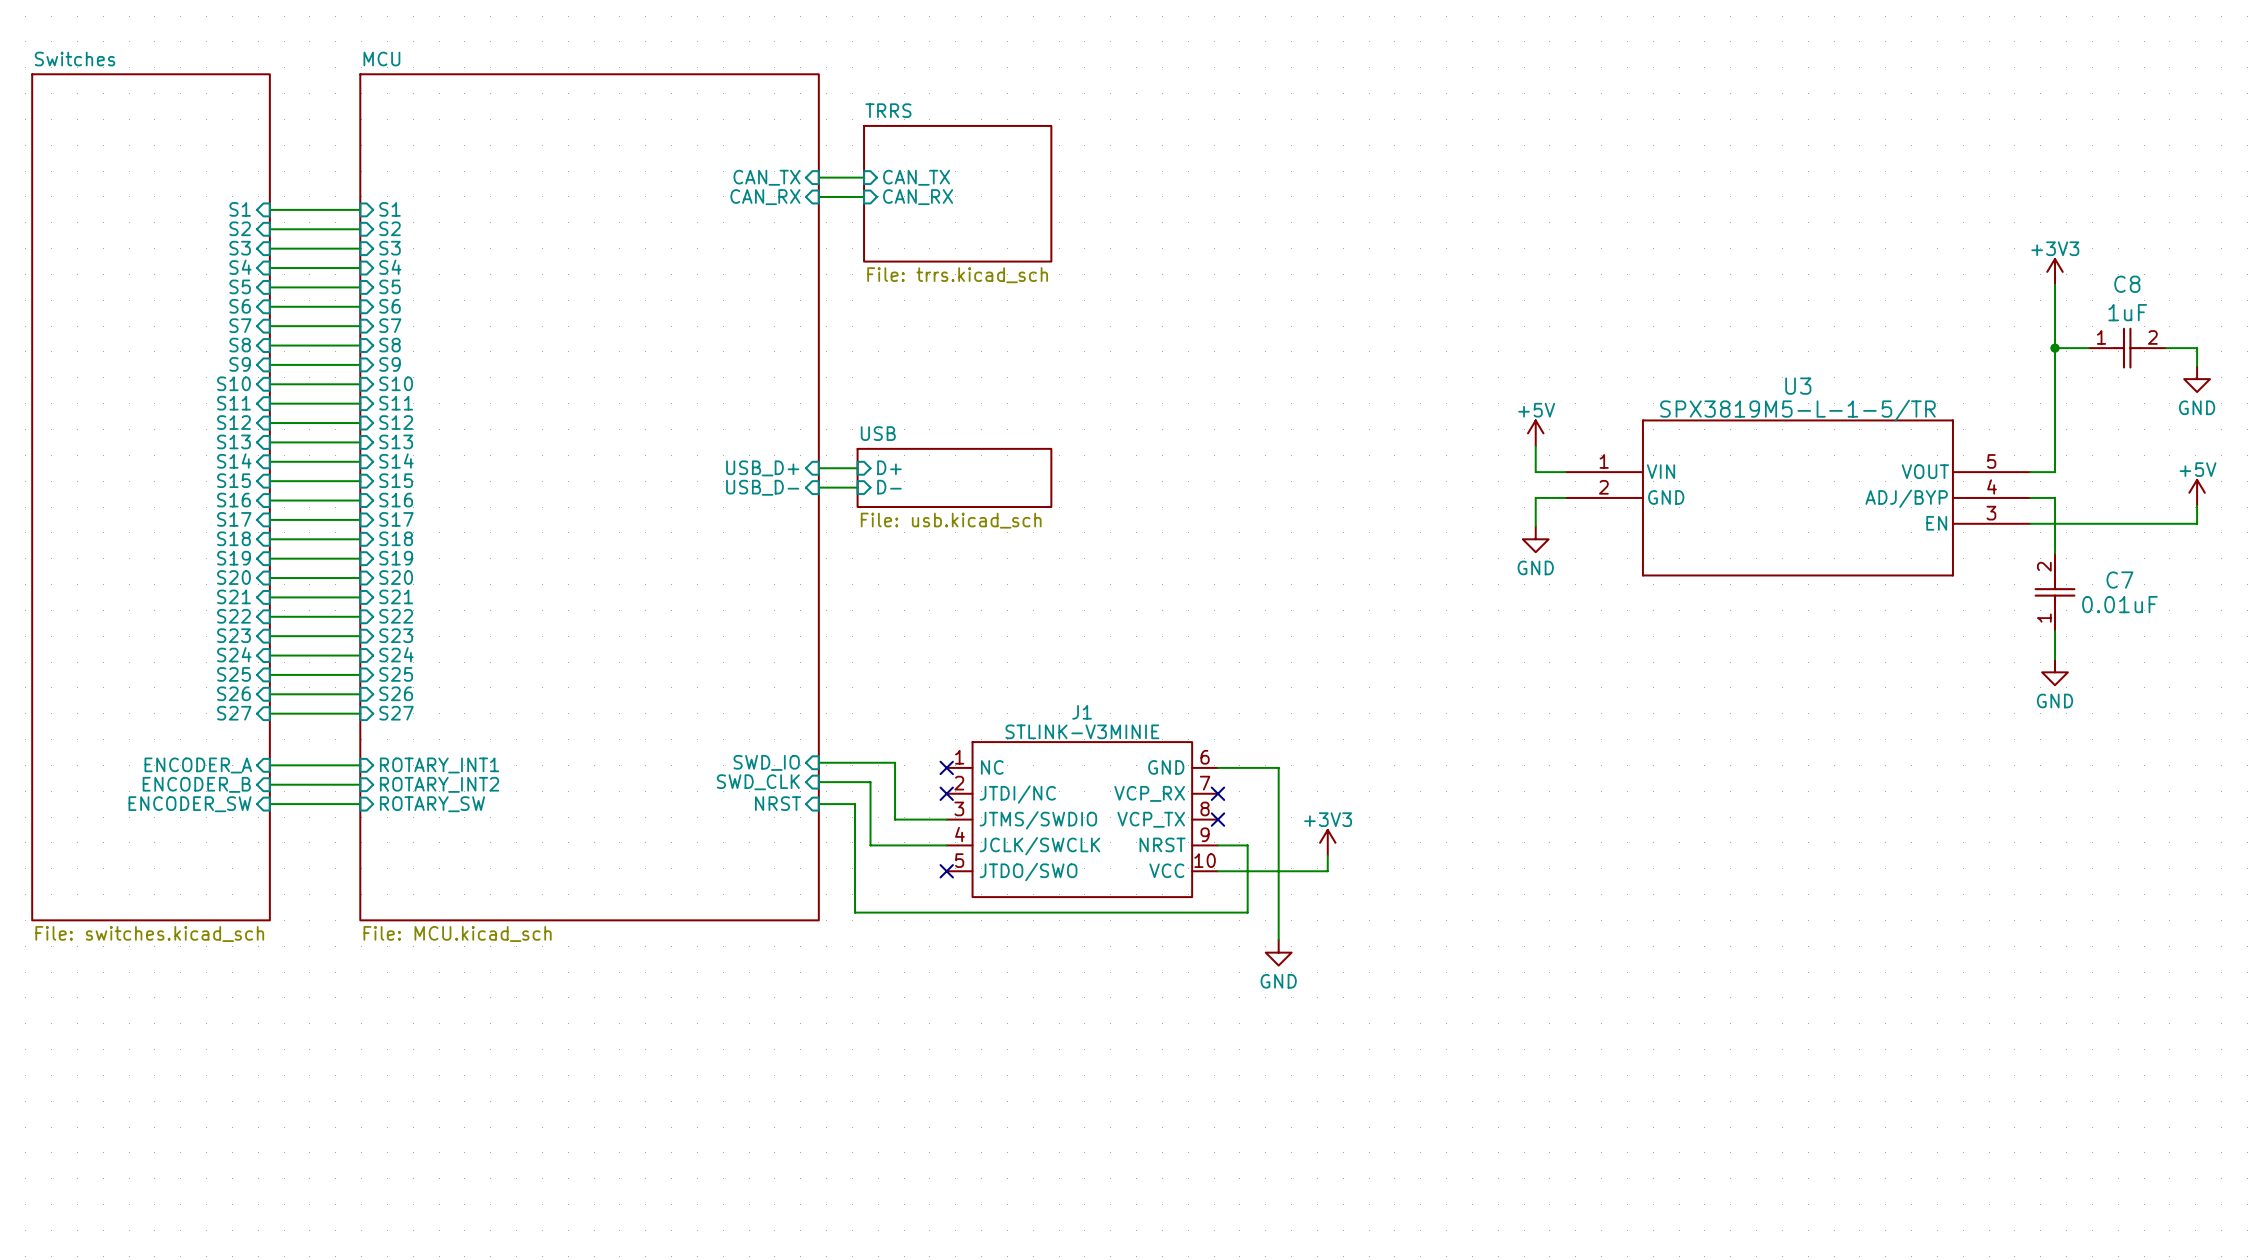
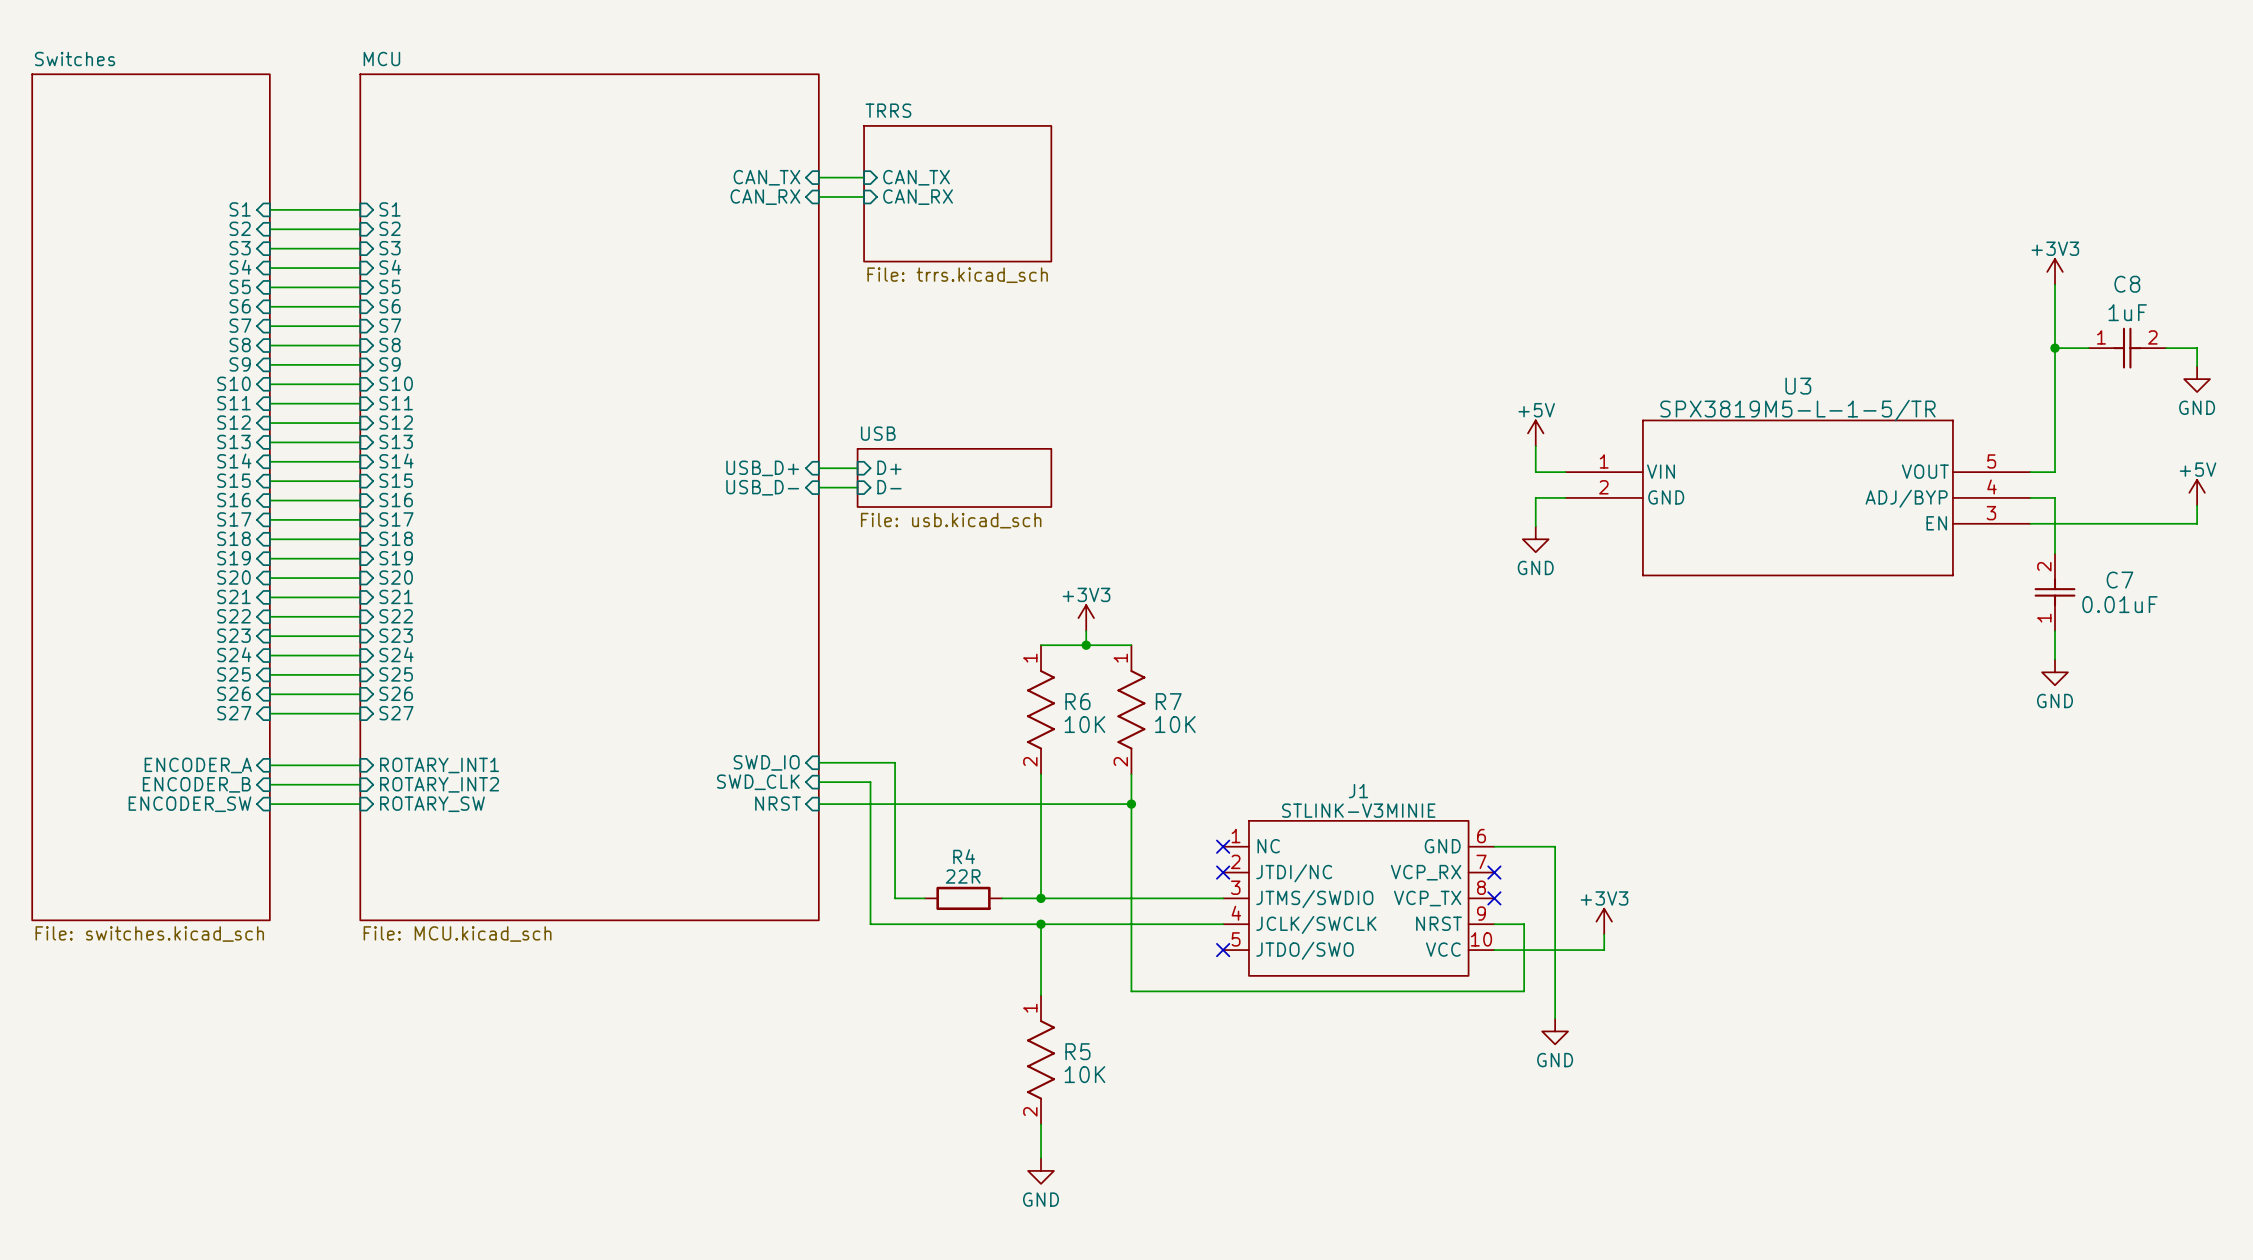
power symbol: none -> +3V3 (1086, 618)
wire: none -> (1086, 631) (1086, 645)
wire: none -> (1041, 645) (1131, 645)
junction: none -> (1086, 645)
R6: none -> 10K (1041, 709)
R7: none -> 10K (1131, 709)
no-connect mark: (946, 767) -> none
wire: (1217, 767) (1278, 767) (1278, 939) -> none
wire: none -> (1041, 774) (1041, 898)
wire: none -> (1131, 774) (1131, 991) (1524, 991) (1524, 924) (1494, 924)
no-connect mark: (946, 793) -> none
no-connect mark: (1217, 793) -> none
wire: (855, 804) (855, 912) (1247, 912) (1247, 845) (1217, 845) -> (855, 804) (1131, 804)
junction: none -> (1131, 804)
wire: (895, 819) (946, 819) -> (895, 819) (895, 898) (924, 898)
J1 position: (1082, 819) -> (1358, 898)
no-connect mark: (1217, 819) -> none
power symbol: +3V3 (1327, 842) -> none
wire: (870, 845) (946, 845) -> (870, 845) (870, 924) (1223, 924)
no-connect mark: none -> (1223, 846)
wire: none -> (1494, 846) (1555, 846) (1555, 1018)
wire: (1327, 855) (1327, 871) (1217, 871) -> none
no-connect mark: (946, 871) -> none
no-connect mark: none -> (1223, 872)
no-connect mark: none -> (1494, 872)
R4: none -> 22R (963, 898)
wire: none -> (1002, 898) (1223, 898)
junction: none -> (1041, 898)
no-connect mark: none -> (1494, 898)
power symbol: none -> +3V3 (1604, 921)
wire: none -> (1041, 924) (1041, 995)
junction: none -> (1041, 924)
wire: none -> (1604, 934) (1604, 950) (1494, 950)
no-connect mark: none -> (1223, 950)
power symbol: GND (1278, 952) -> none
power symbol: none -> GND (1555, 1031)
R5: none -> 10K (1041, 1059)
wire: none -> (1041, 1124) (1041, 1158)
power symbol: none -> GND (1041, 1170)

